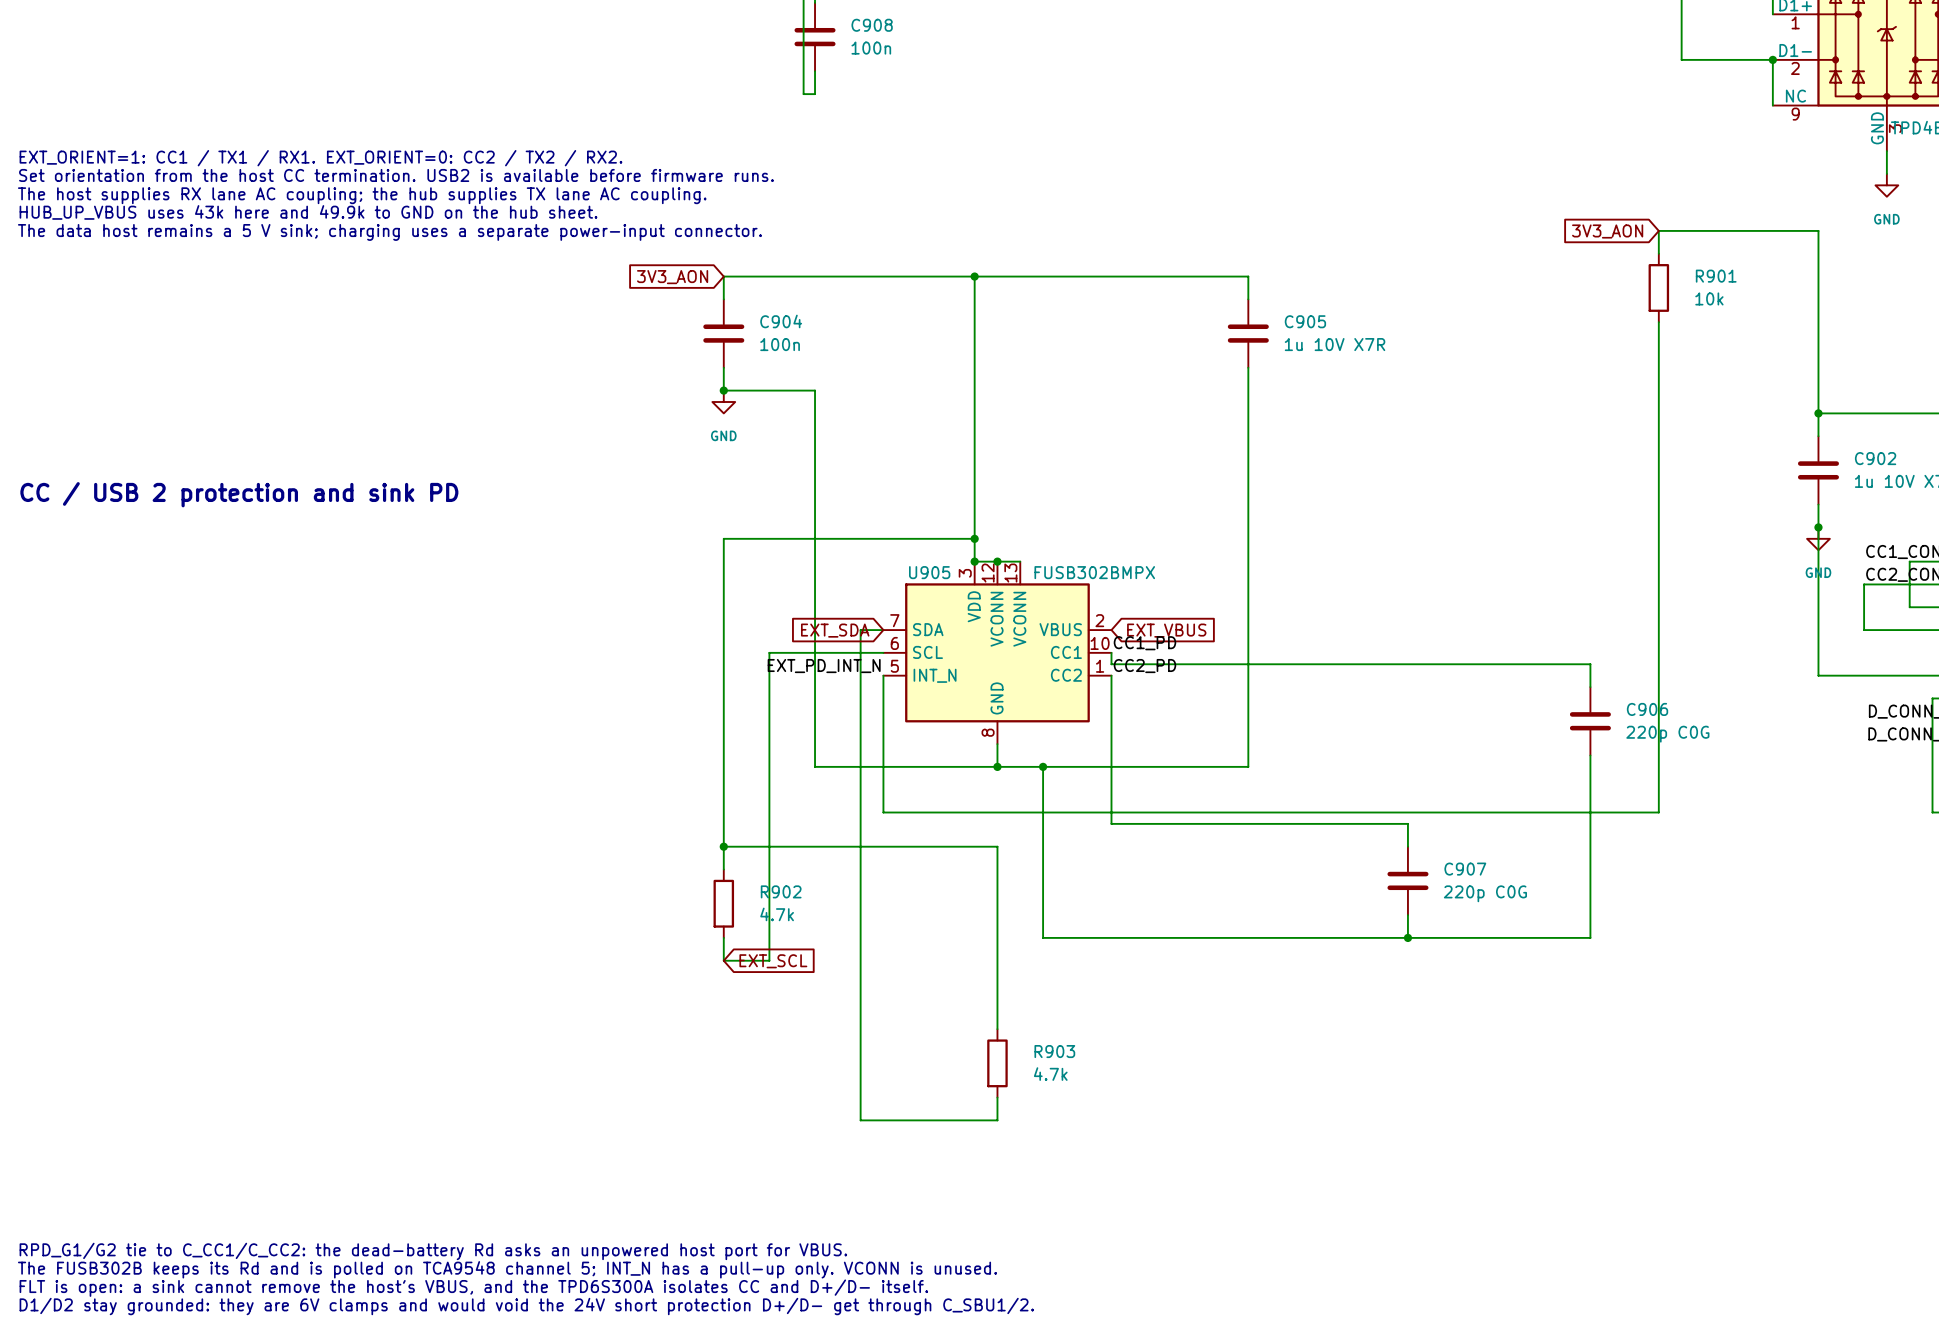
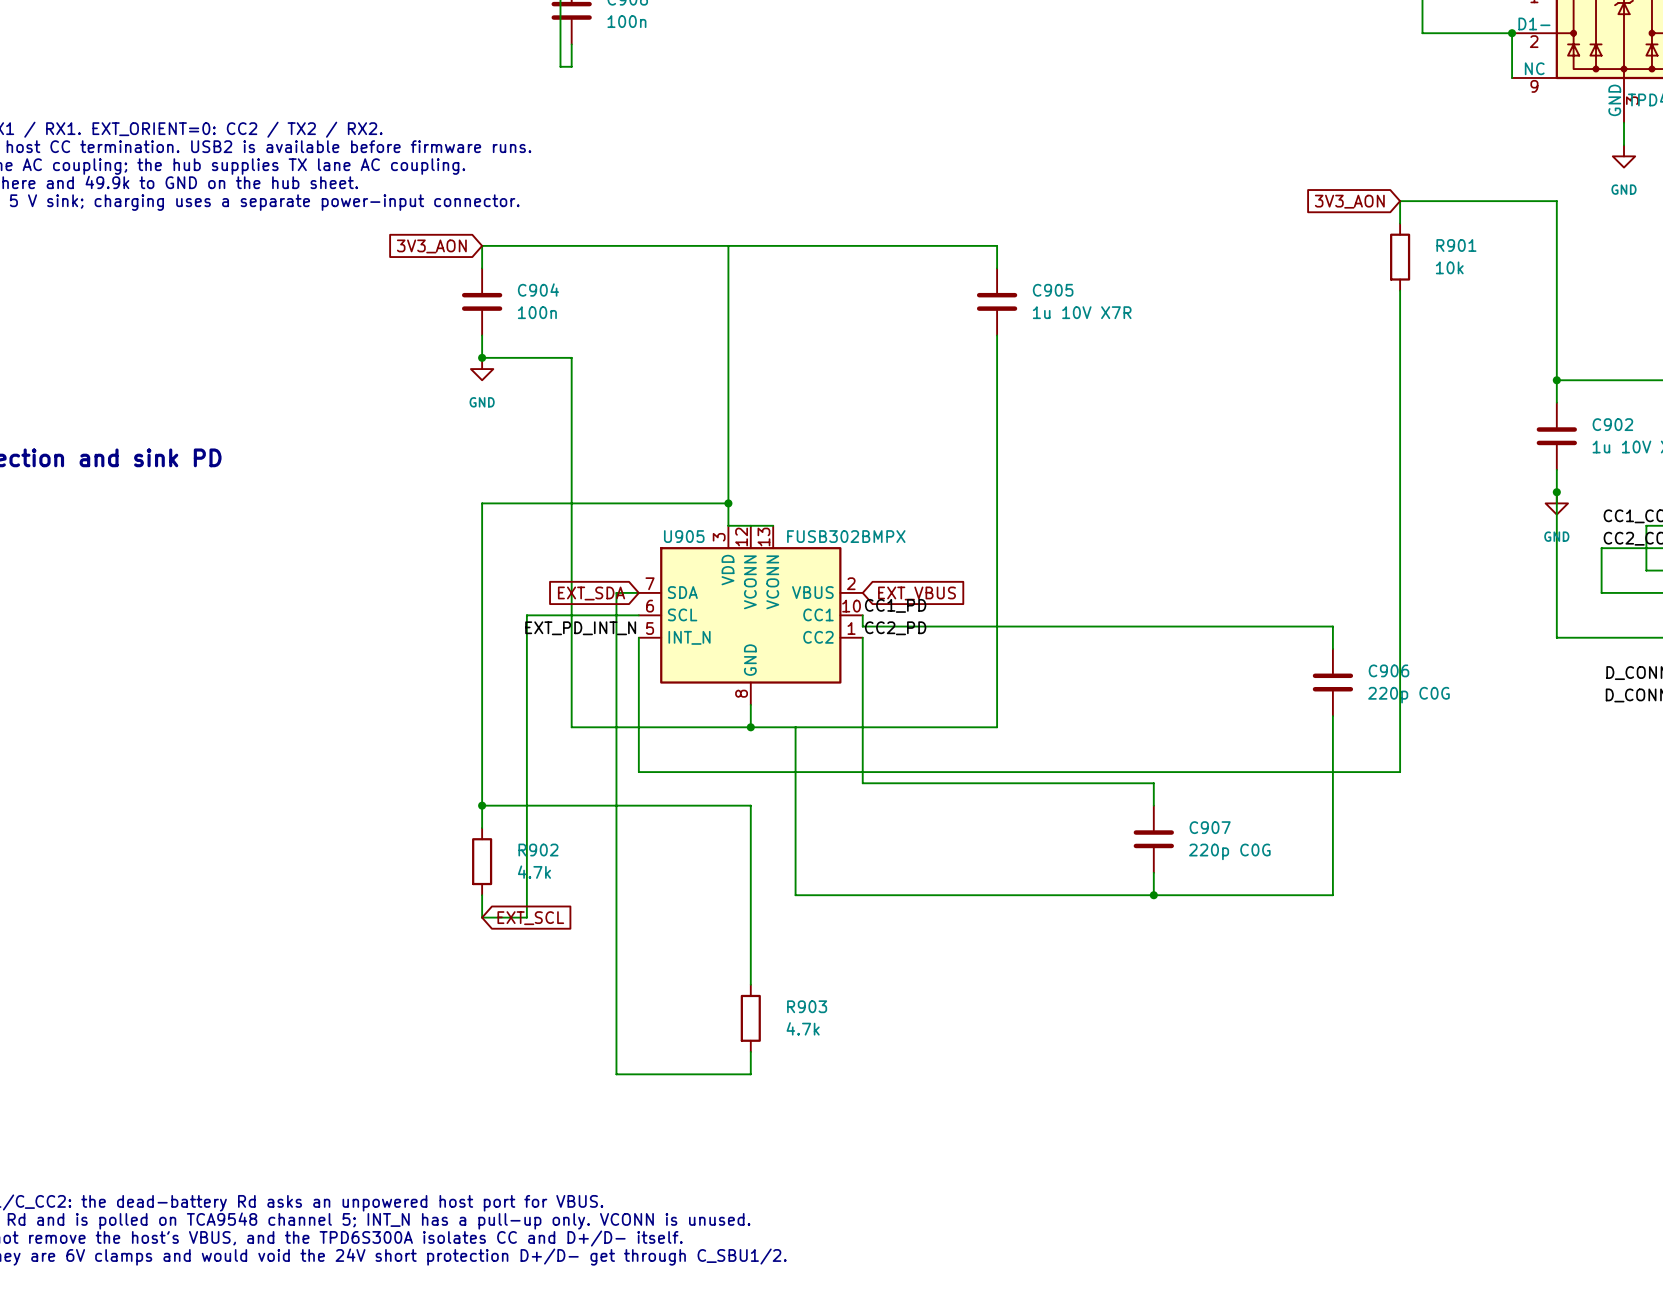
junction: (974, 276) -> none
junction: (974, 561) -> none
junction: (997, 561) -> none
junction: (1043, 766) -> none

